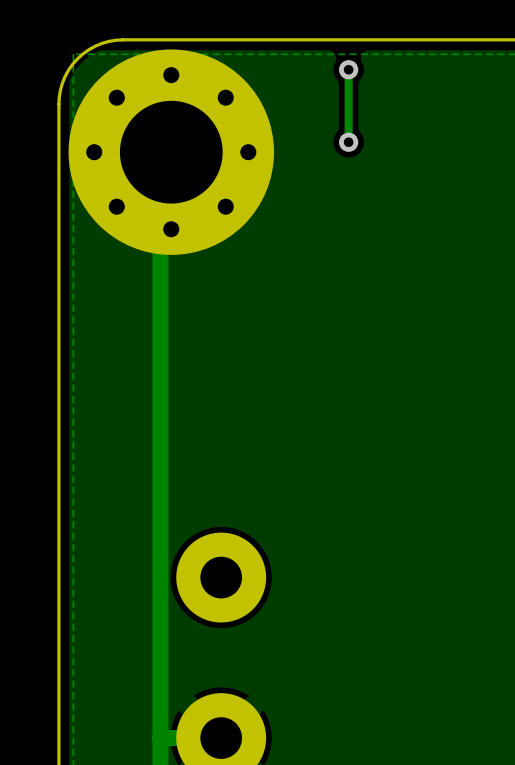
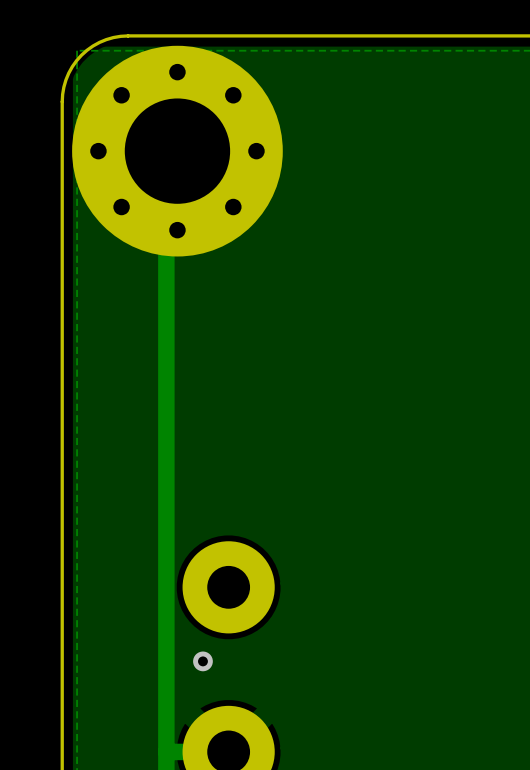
track: (348, 69) (348, 142) -> none
via: (348, 69) -> none
via: (348, 142) -> none
via: none -> (202, 661)

